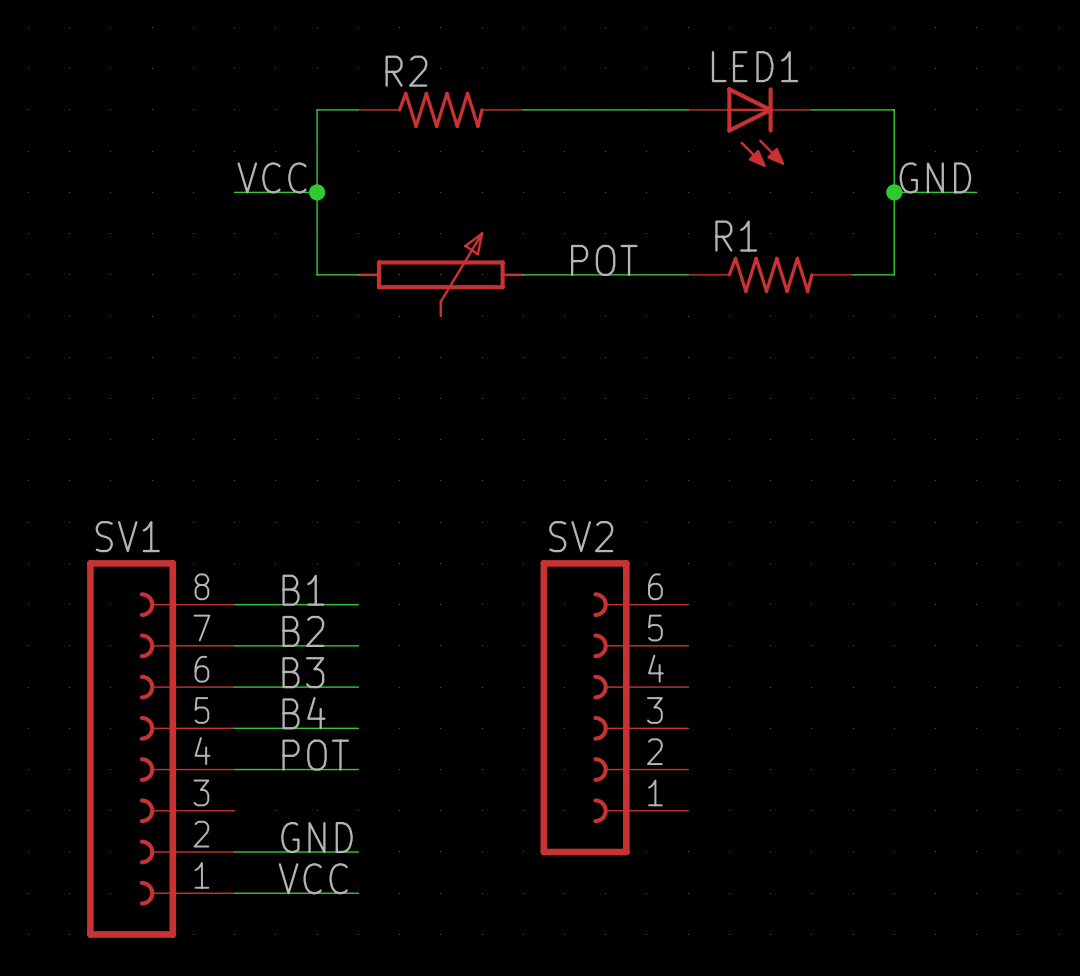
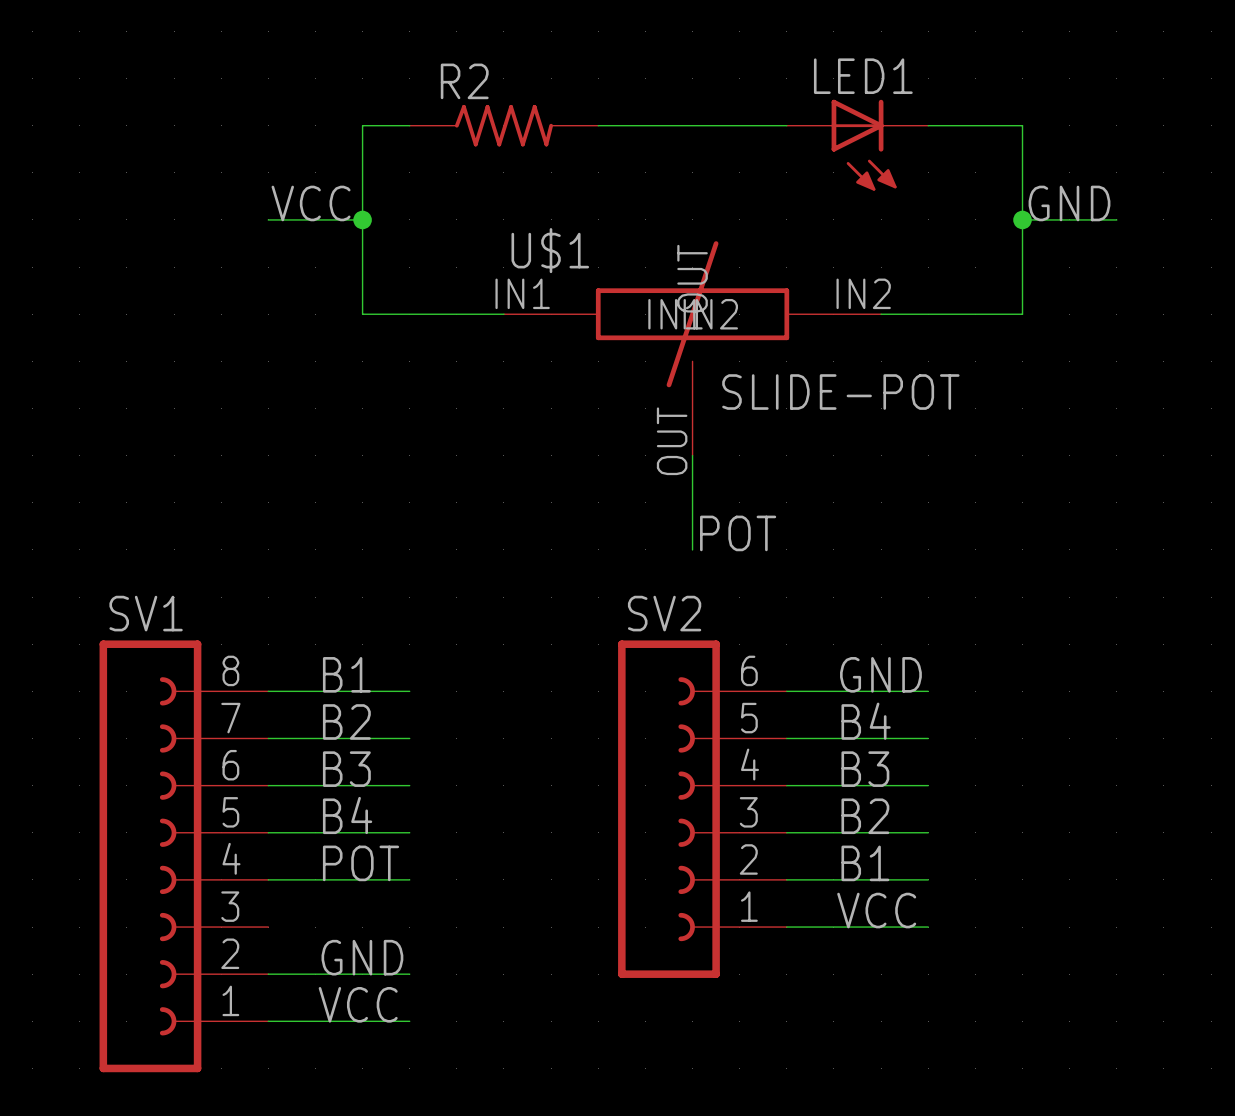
label position: POT (604, 260) -> POT (738, 533)
wire: none -> (409, 314) (503, 314)
part: (440, 274) -> none
wire: (523, 274) (688, 274) -> none
R1: (770, 274) -> none
U$1: none -> SLIDE-POT (692, 348)
wire: none -> (692, 455) (692, 549)
label: none -> GND (880, 674)
wire: none -> (786, 691) (928, 691)
label: none -> B4 (866, 721)
wire: none -> (786, 738) (928, 738)
label: none -> B3 (865, 769)
wire: none -> (786, 785) (928, 785)
label: none -> B2 (865, 816)
wire: none -> (786, 832) (928, 832)
label: none -> B1 (865, 863)
wire: none -> (786, 879) (928, 879)
label: none -> VCC (876, 910)
wire: none -> (786, 927) (928, 927)

